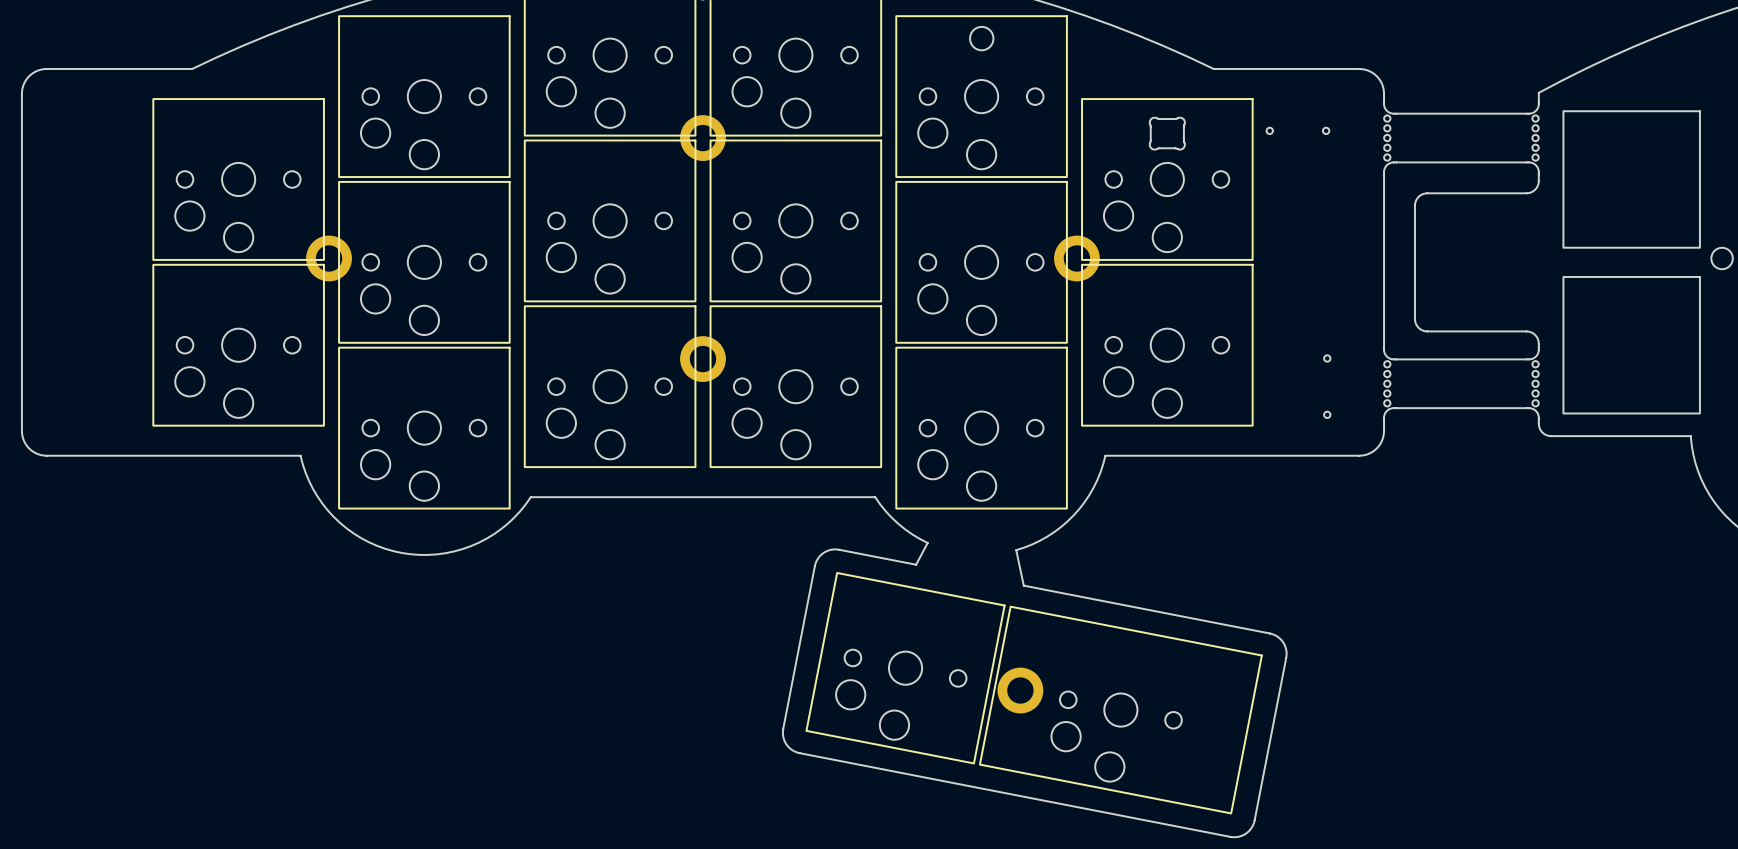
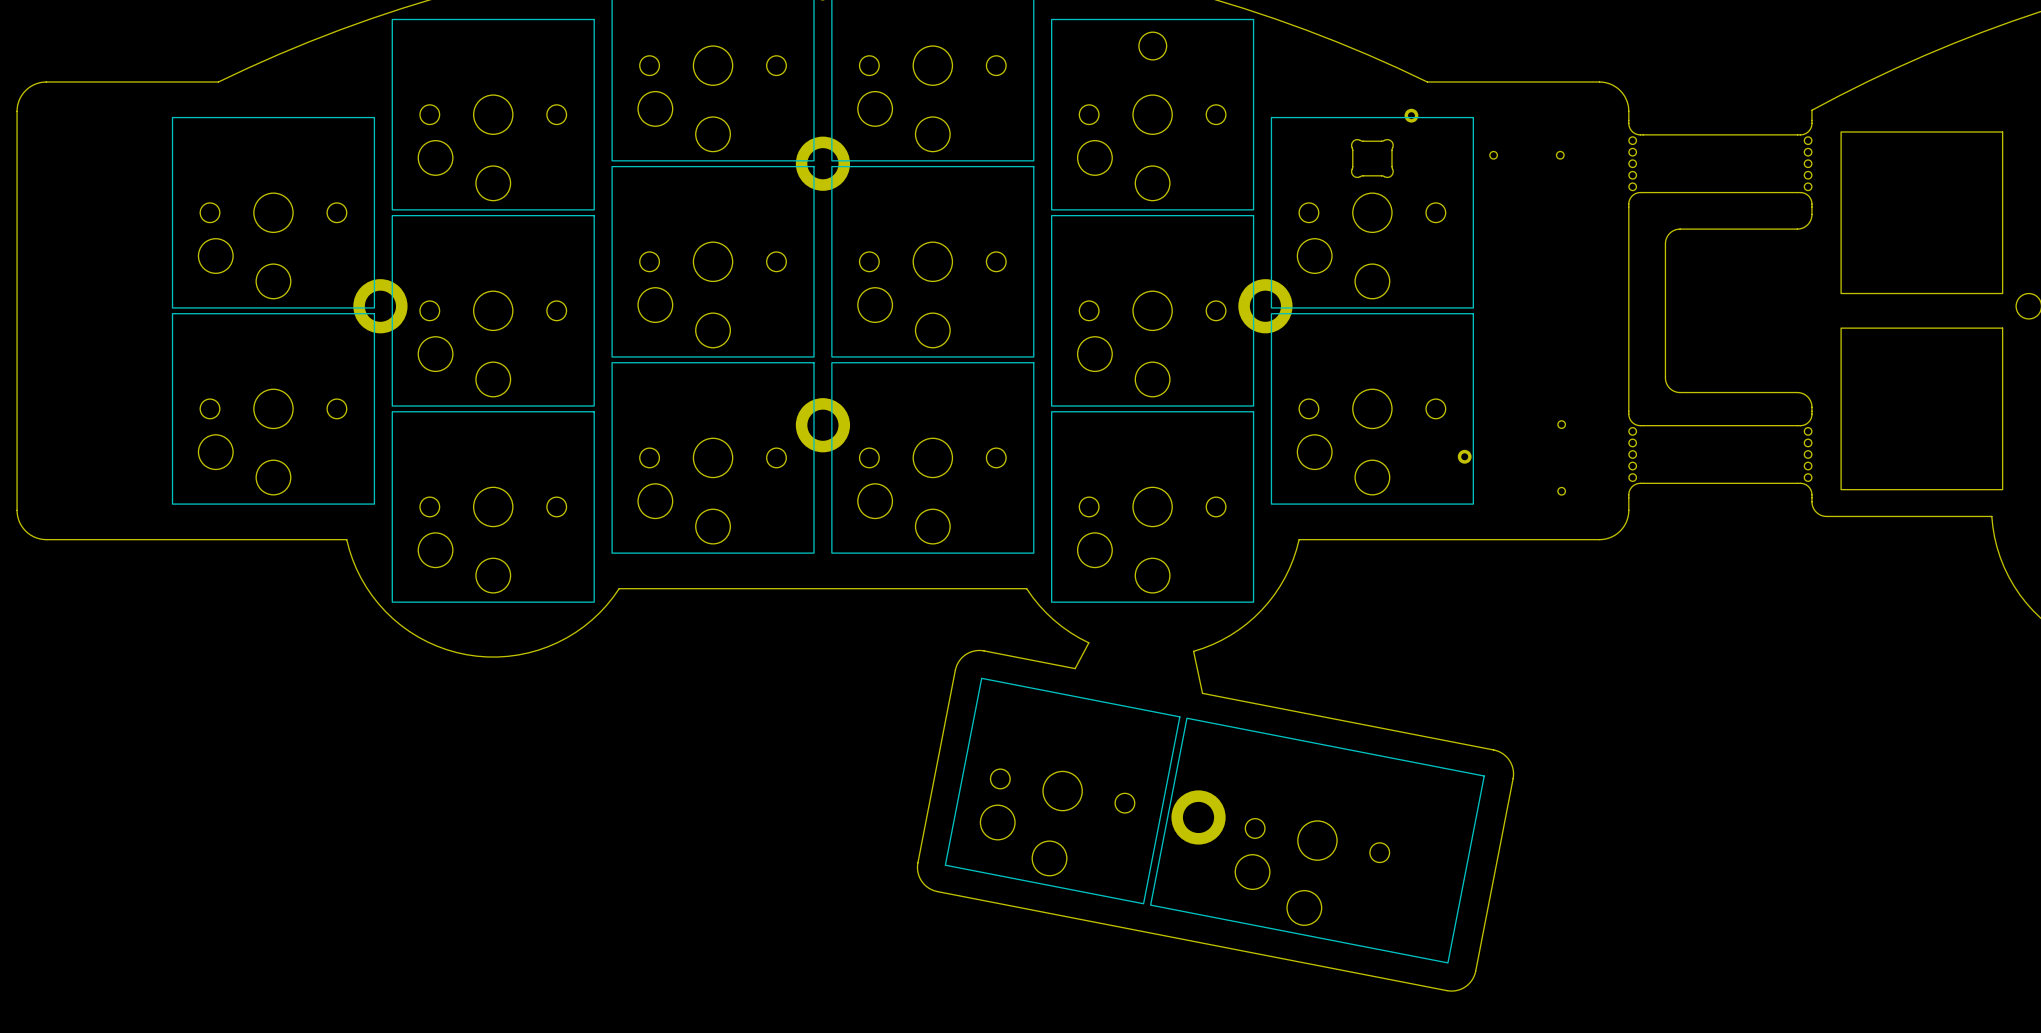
part: none -> (1411, 115)
part: none -> (1464, 456)

